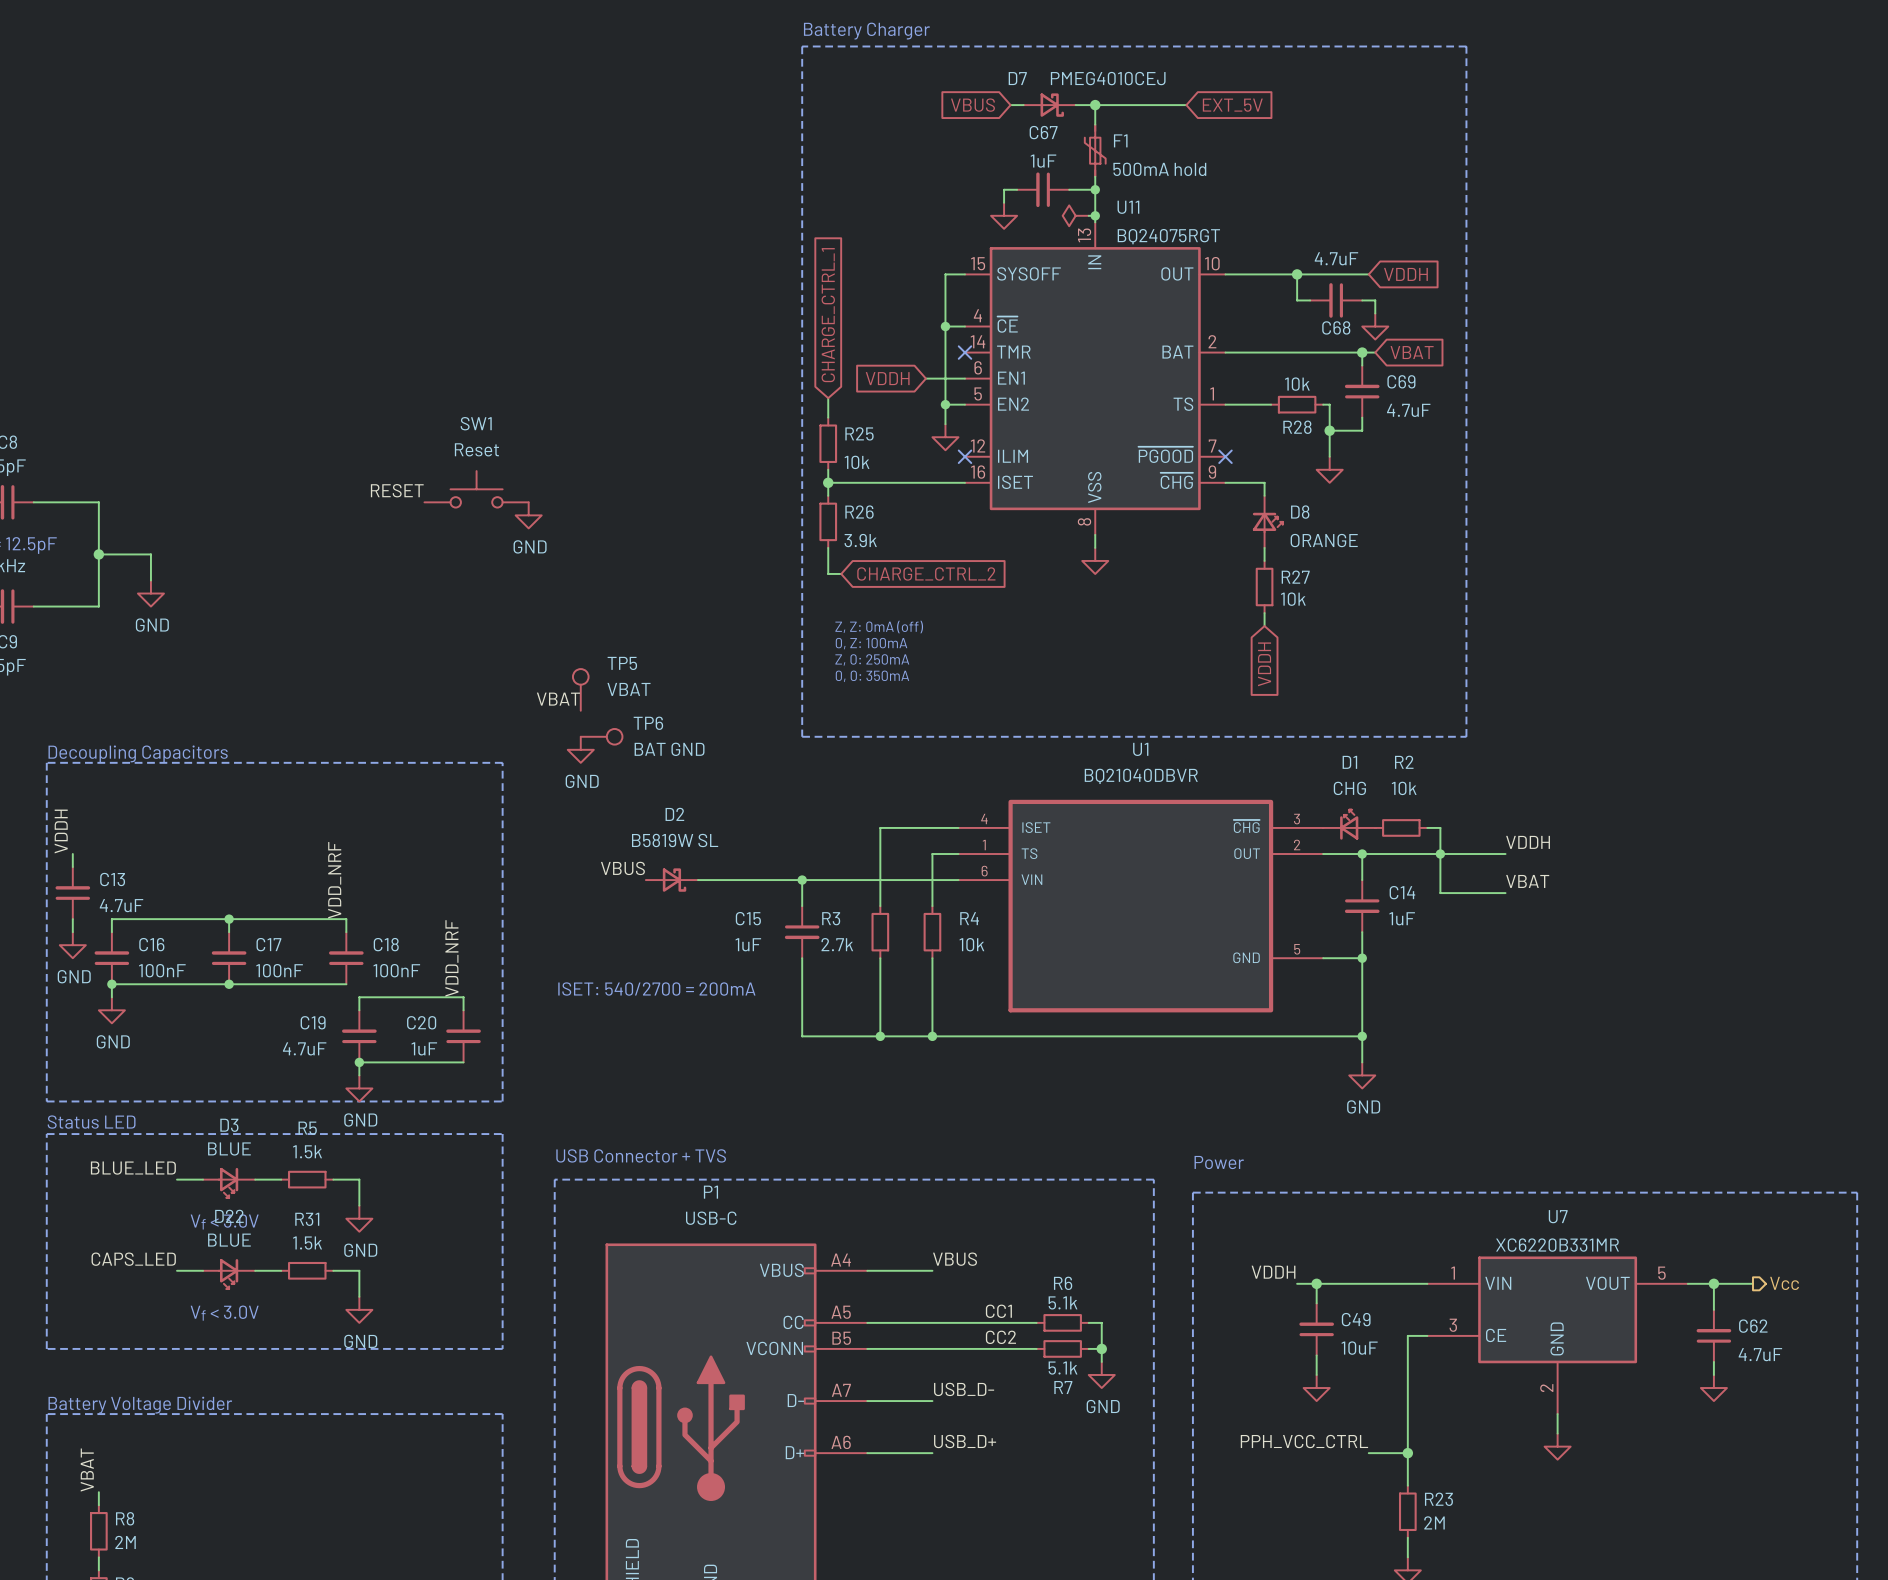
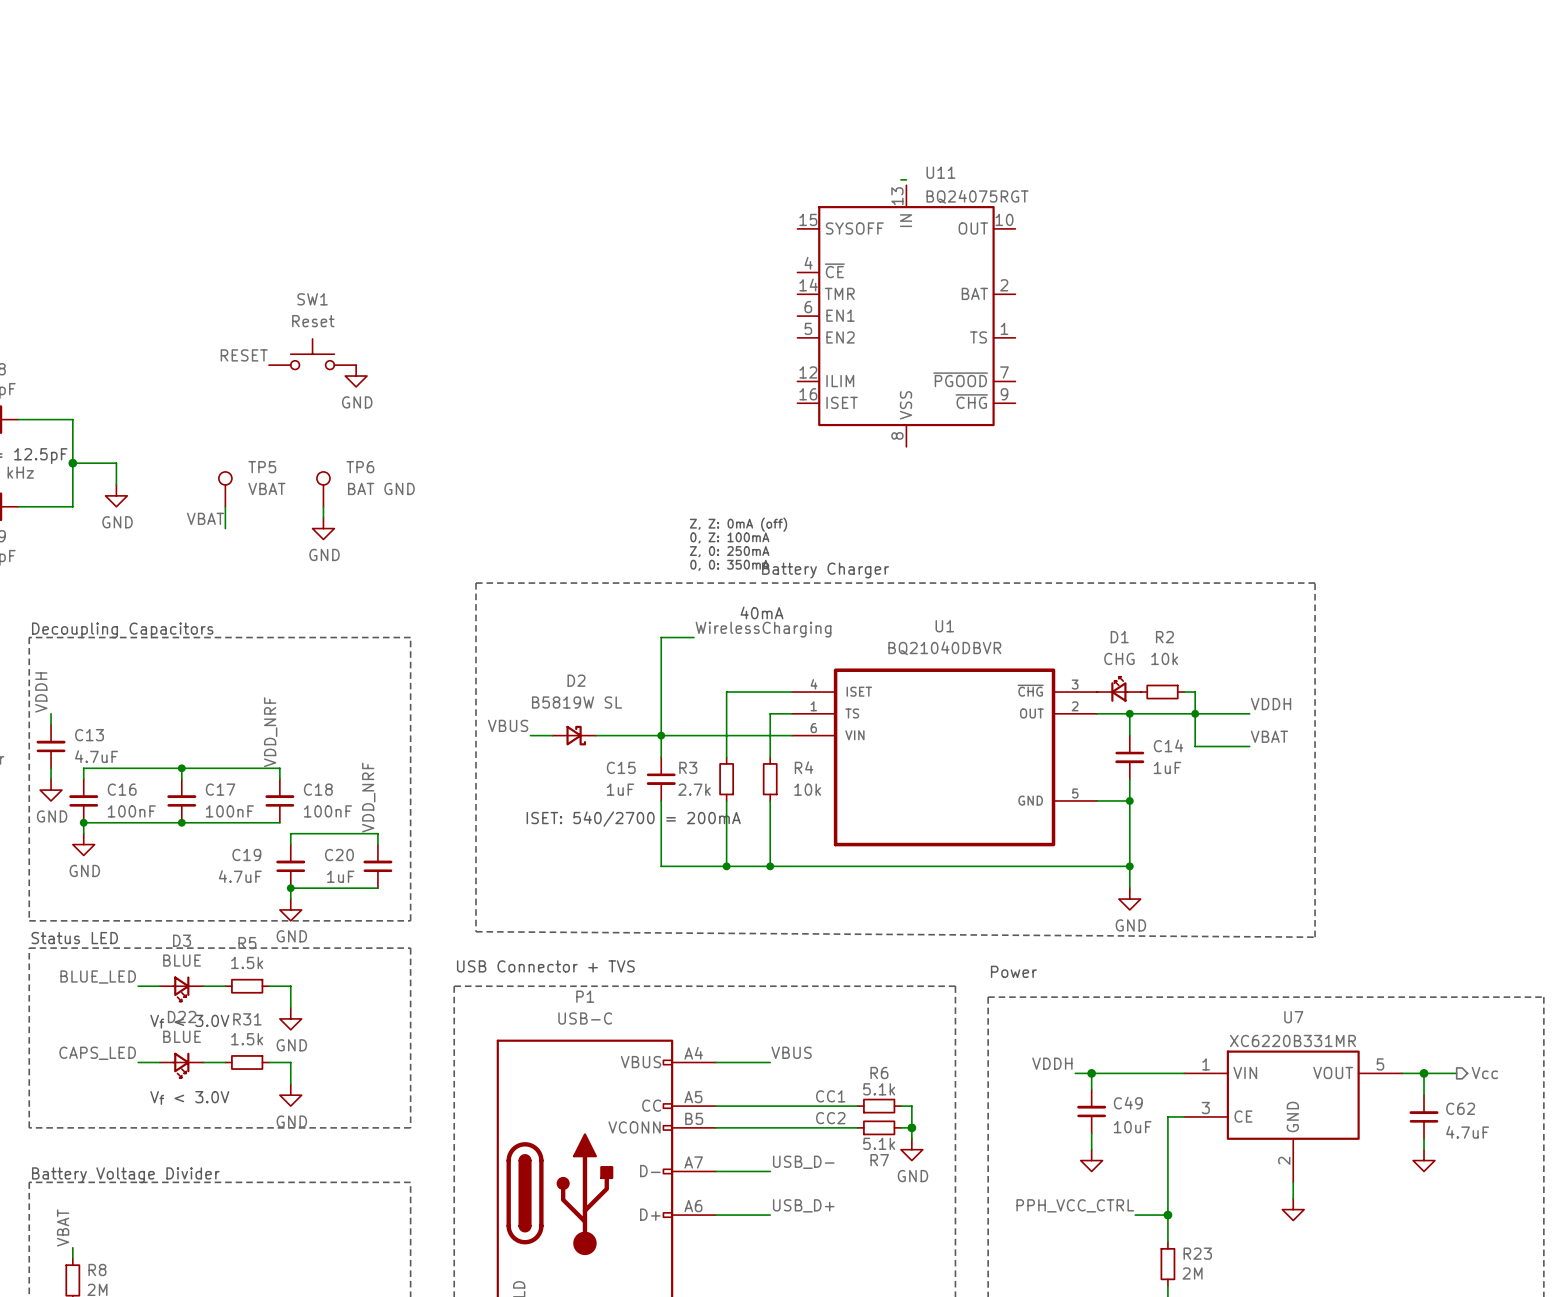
text: Battery Charger (866, 31) -> none
line: (802, 46) (802, 736) (1466, 736) (1466, 46) (802, 46) -> none
global label: VBUS (972, 105) -> none
wire: (1010, 105) (1023, 105) -> none
D7: PMEG4010CEJ (1049, 105) -> none
wire: (1075, 105) (1186, 105) -> none
wire: (1095, 105) (1095, 124) -> none
junction: (1095, 105) -> none
global label: EXT_5V (1232, 105) -> none
F1: 500mA hold (1095, 150) -> none
wire: (1095, 176) (1095, 222) -> none
wire: (1017, 189) (1004, 189) (1004, 202) -> none
C67: 1uF (1043, 189) -> none
wire: (1069, 189) (1095, 189) -> none
junction: (1095, 189) -> none
power symbol: (1004, 215) -> none
power symbol: (1075, 215) -> none
junction: (1095, 215) -> none
wire: (965, 274) (945, 274) (945, 424) -> none
wire: (1225, 274) (1368, 274) -> none
wire: (1297, 274) (1297, 300) (1310, 300) -> none
junction: (1297, 274) -> none
global label: VDDH (1405, 274) -> none
C68: 4.7uF (1336, 300) -> none
wire: (1362, 300) (1375, 300) (1375, 313) -> none
global label: CHARGE_CTRL_1 (828, 315) -> none
wire: (945, 326) (965, 326) -> none
junction: (945, 326) -> none
power symbol: (1375, 326) -> none
no-connect mark: (965, 352) -> none
wire: (1225, 352) (1375, 352) -> none
wire: (1362, 352) (1362, 365) -> none
junction: (1362, 352) -> none
global label: VBAT (1412, 352) -> none
global label: VDDH (887, 378) -> none
wire: (925, 378) (965, 378) -> none
C69: 4.7uF (1362, 391) -> none
wire: (828, 398) (828, 417) -> none
wire: (945, 404) (965, 404) -> none
junction: (945, 404) -> none
wire: (1225, 404) (1271, 404) -> none
R28: 10k (1297, 404) -> none
wire: (1323, 404) (1329, 404) (1329, 456) -> none
wire: (1362, 417) (1362, 430) (1329, 430) -> none
junction: (1329, 430) -> none
power symbol: (945, 437) -> none
R25: 10k (828, 443) -> none
power symbol: none -> GND (356, 376)
no-connect mark: (965, 456) -> none
no-connect mark: (1225, 456) -> none
wire: (828, 469) (828, 495) -> none
power symbol: (1329, 469) -> none
wire: (828, 482) (965, 482) -> none
junction: (828, 482) -> none
wire: (1225, 482) (1264, 482) (1264, 495) -> none
SW1 position: (476, 489) -> (312, 354)
label position: RESET (397, 490) -> RESET (244, 355)
power symbol: GND (528, 515) -> none
R26: 3.9k (828, 521) -> none
D8: ORANGE (1267, 521) -> none
wire: (1095, 534) (1095, 547) -> none
wire: (828, 547) (828, 573) (841, 573) -> none
wire: (1264, 547) (1264, 560) -> none
power symbol: (1095, 560) -> none
global label: CHARGE_CTRL_2 (926, 573) -> none
R27: 10k (1264, 587) -> none
wire: none -> (225, 506) (225, 528)
wire: none -> (323, 506) (323, 517)
wire: (1264, 613) (1264, 626) -> none
label: none -> VBAT (205, 518)
power symbol: none -> GND (323, 528)
global label: VDDH (1264, 664) -> none
text: none -> Battery Charger (825, 570)
TP5 position: (580, 689) -> (225, 489)
line: none -> (476, 583) (1315, 583) (1315, 937) (476, 931) (476, 583)
label: VBAT (558, 699) -> none
text: none -> 40mA (762, 612)
TP6 position: (601, 736) -> (323, 489)
TP6 rotation: 0° (614, 736) -> 90° counterclockwise (323, 478)
power symbol: GND (580, 749) -> none
label: none -> WirelessCharging (763, 629)
wire: none -> (693, 637) (661, 637) (661, 735)
D2 position: (671, 880) -> (574, 735)
text position: ISET: 540/2700 = 200mA (656, 989) -> ISET: 540/2700 = 200mA (633, 819)

